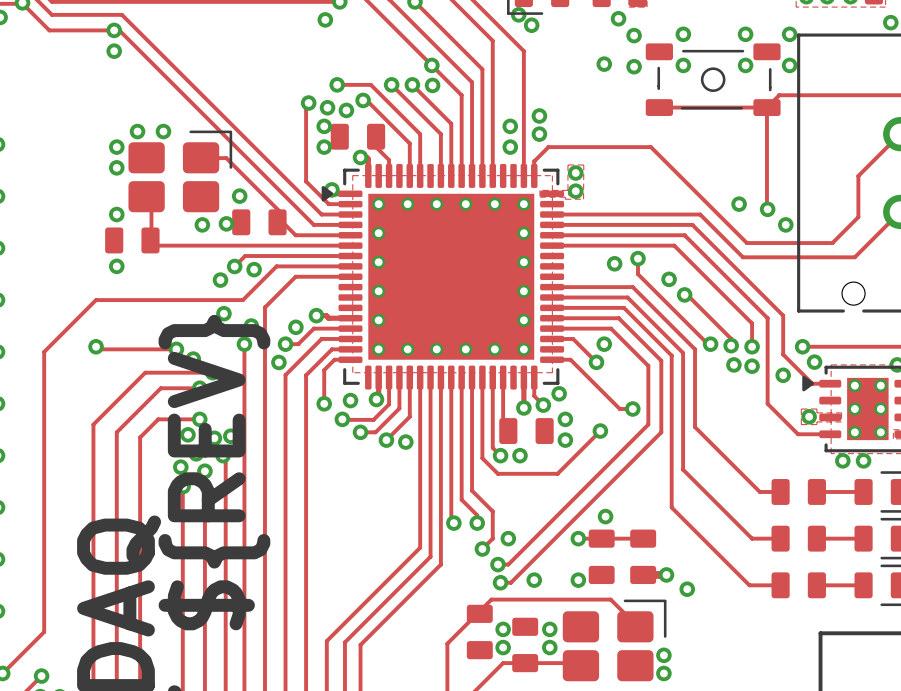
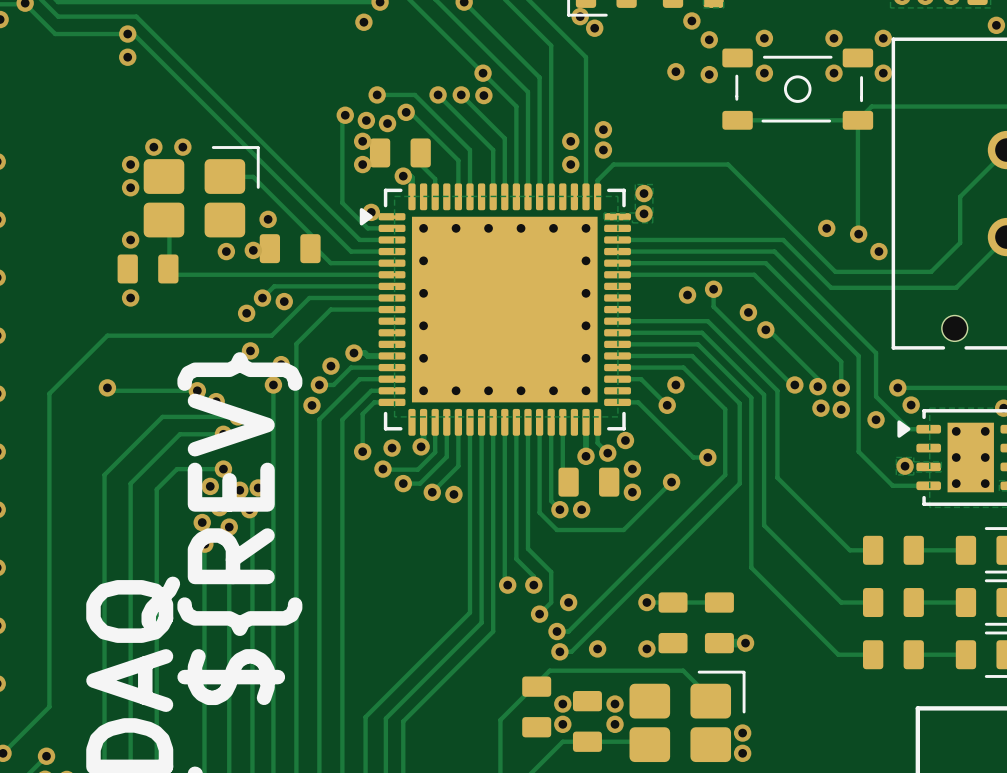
via: (842, 460) -> none
via: (863, 460) -> none
via: (605, 516) -> none
via: (687, 589) -> none

